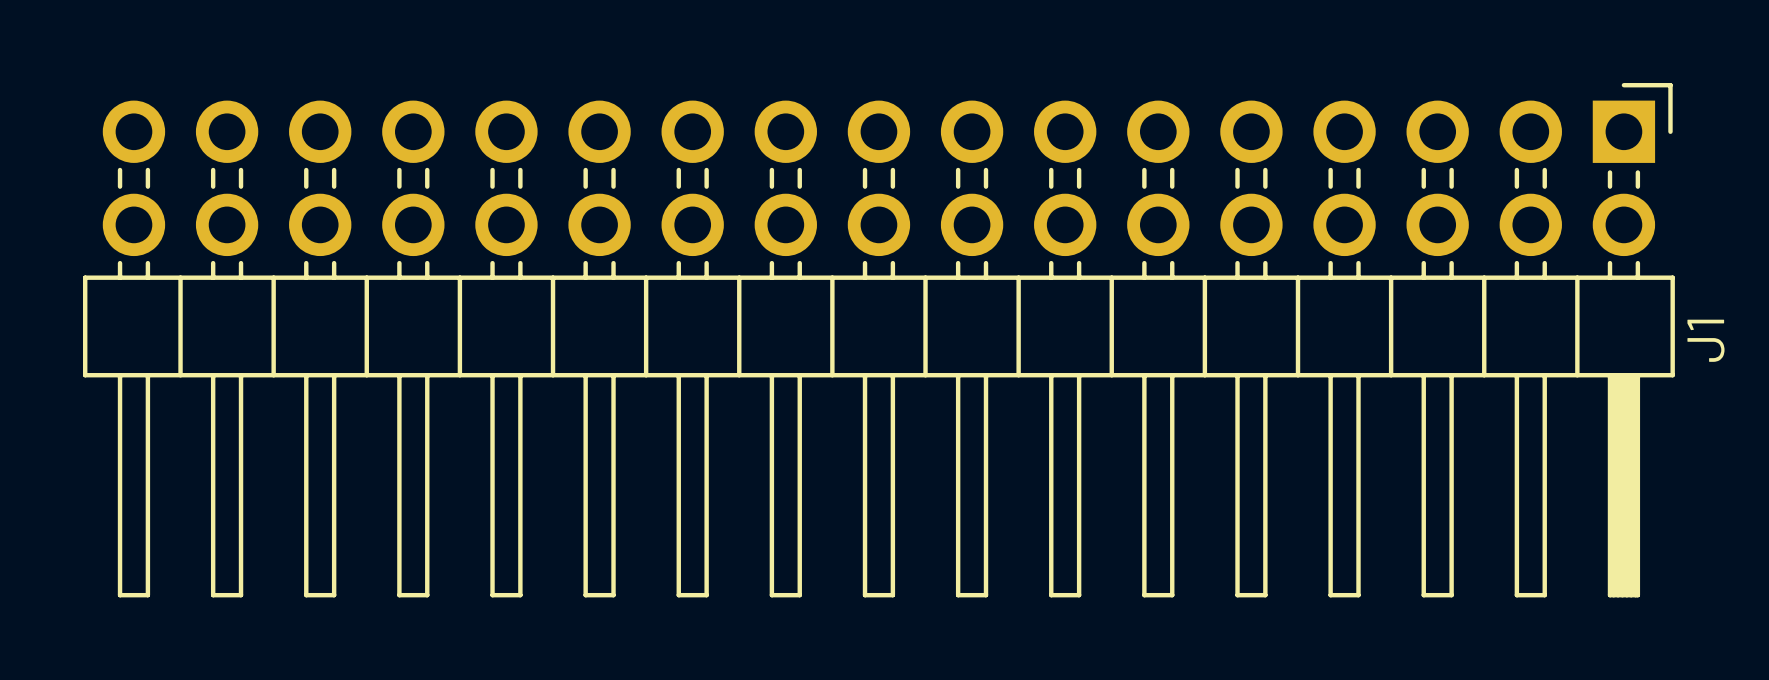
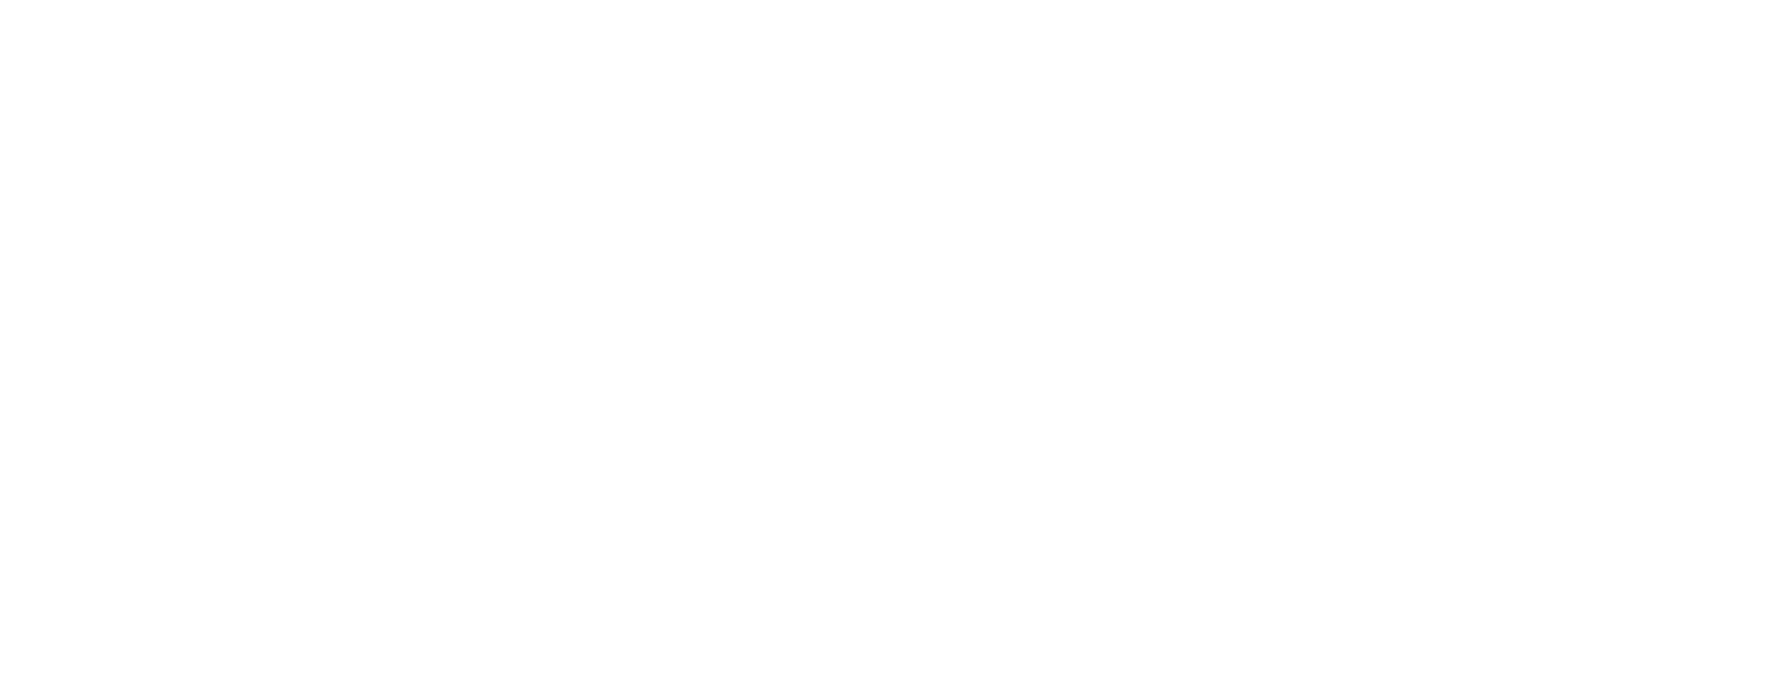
J1: (878, 340) -> none

